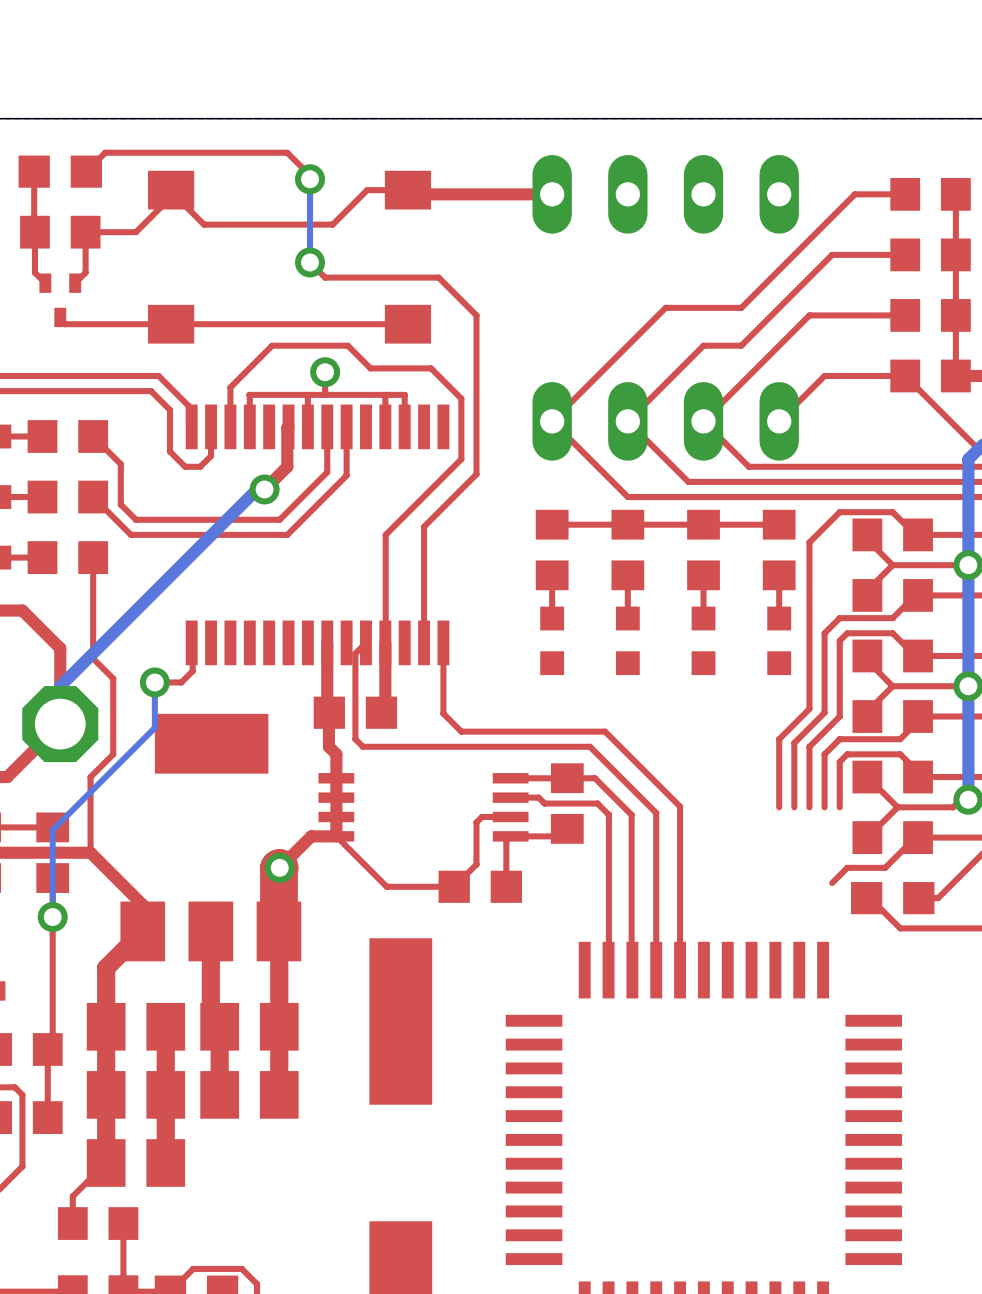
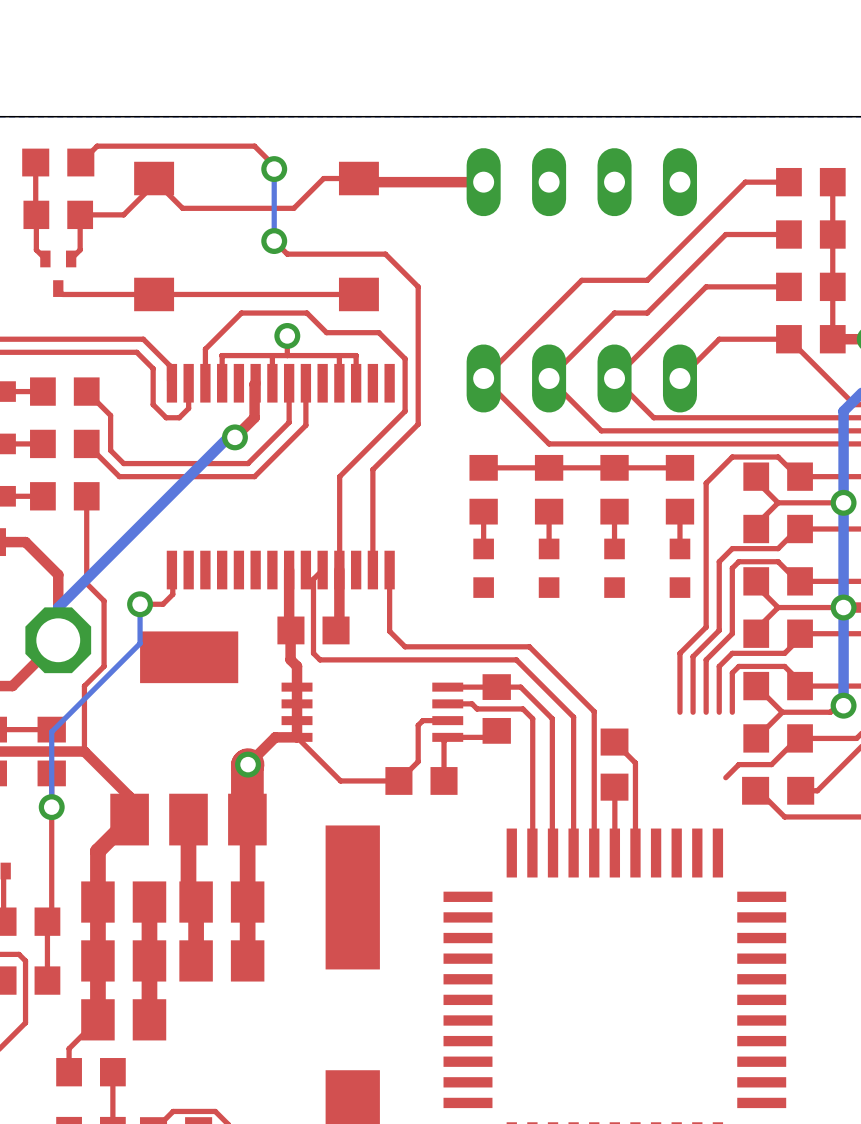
top track: none -> (614, 742) (635, 762) (635, 853)
part: none -> (614, 764)
top track: none -> (614, 787) (614, 853)

